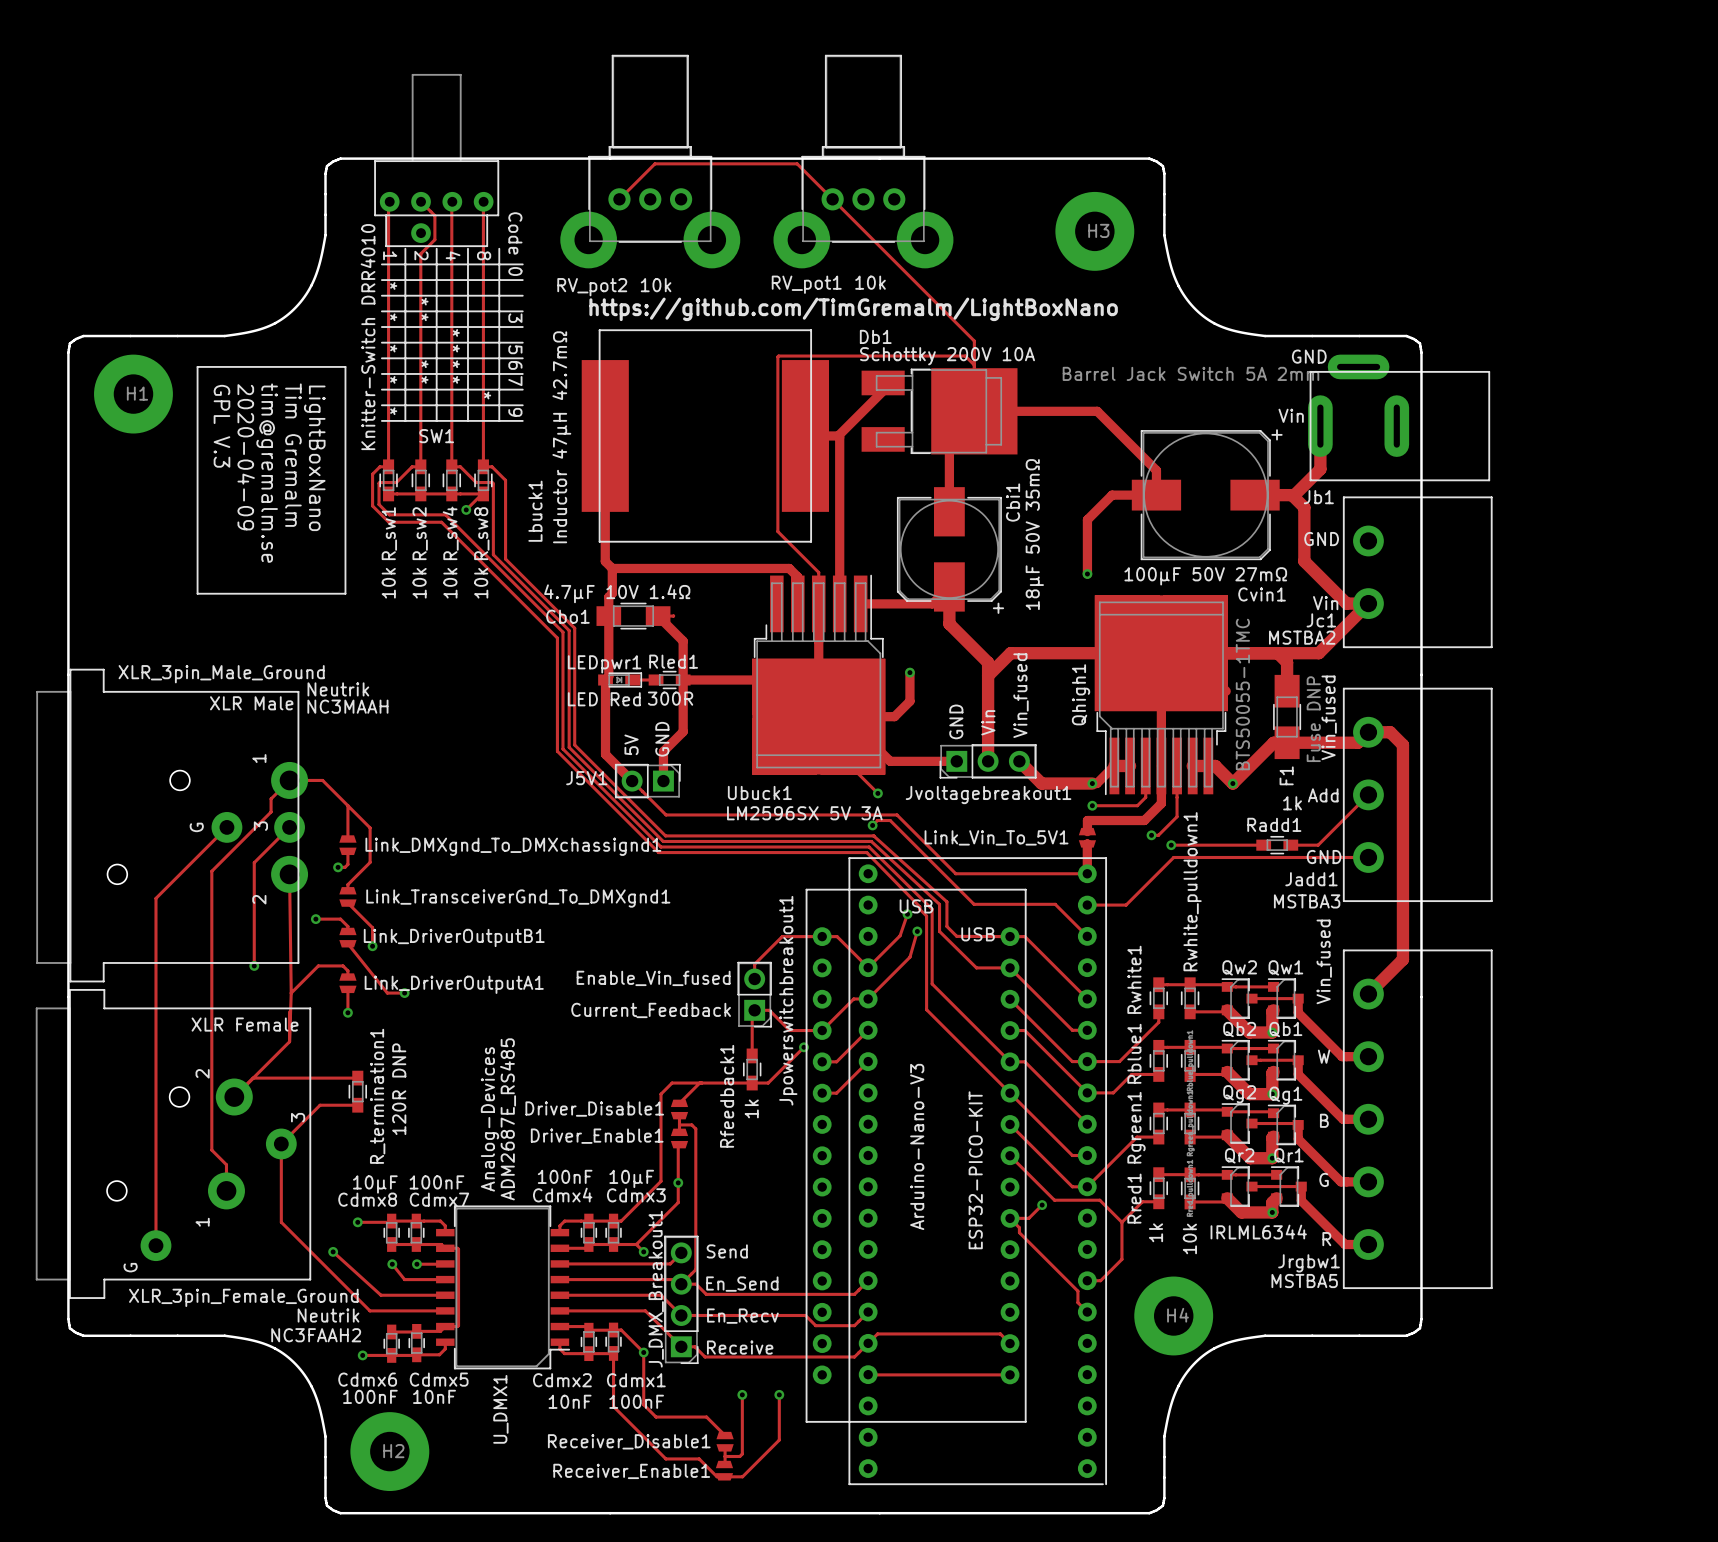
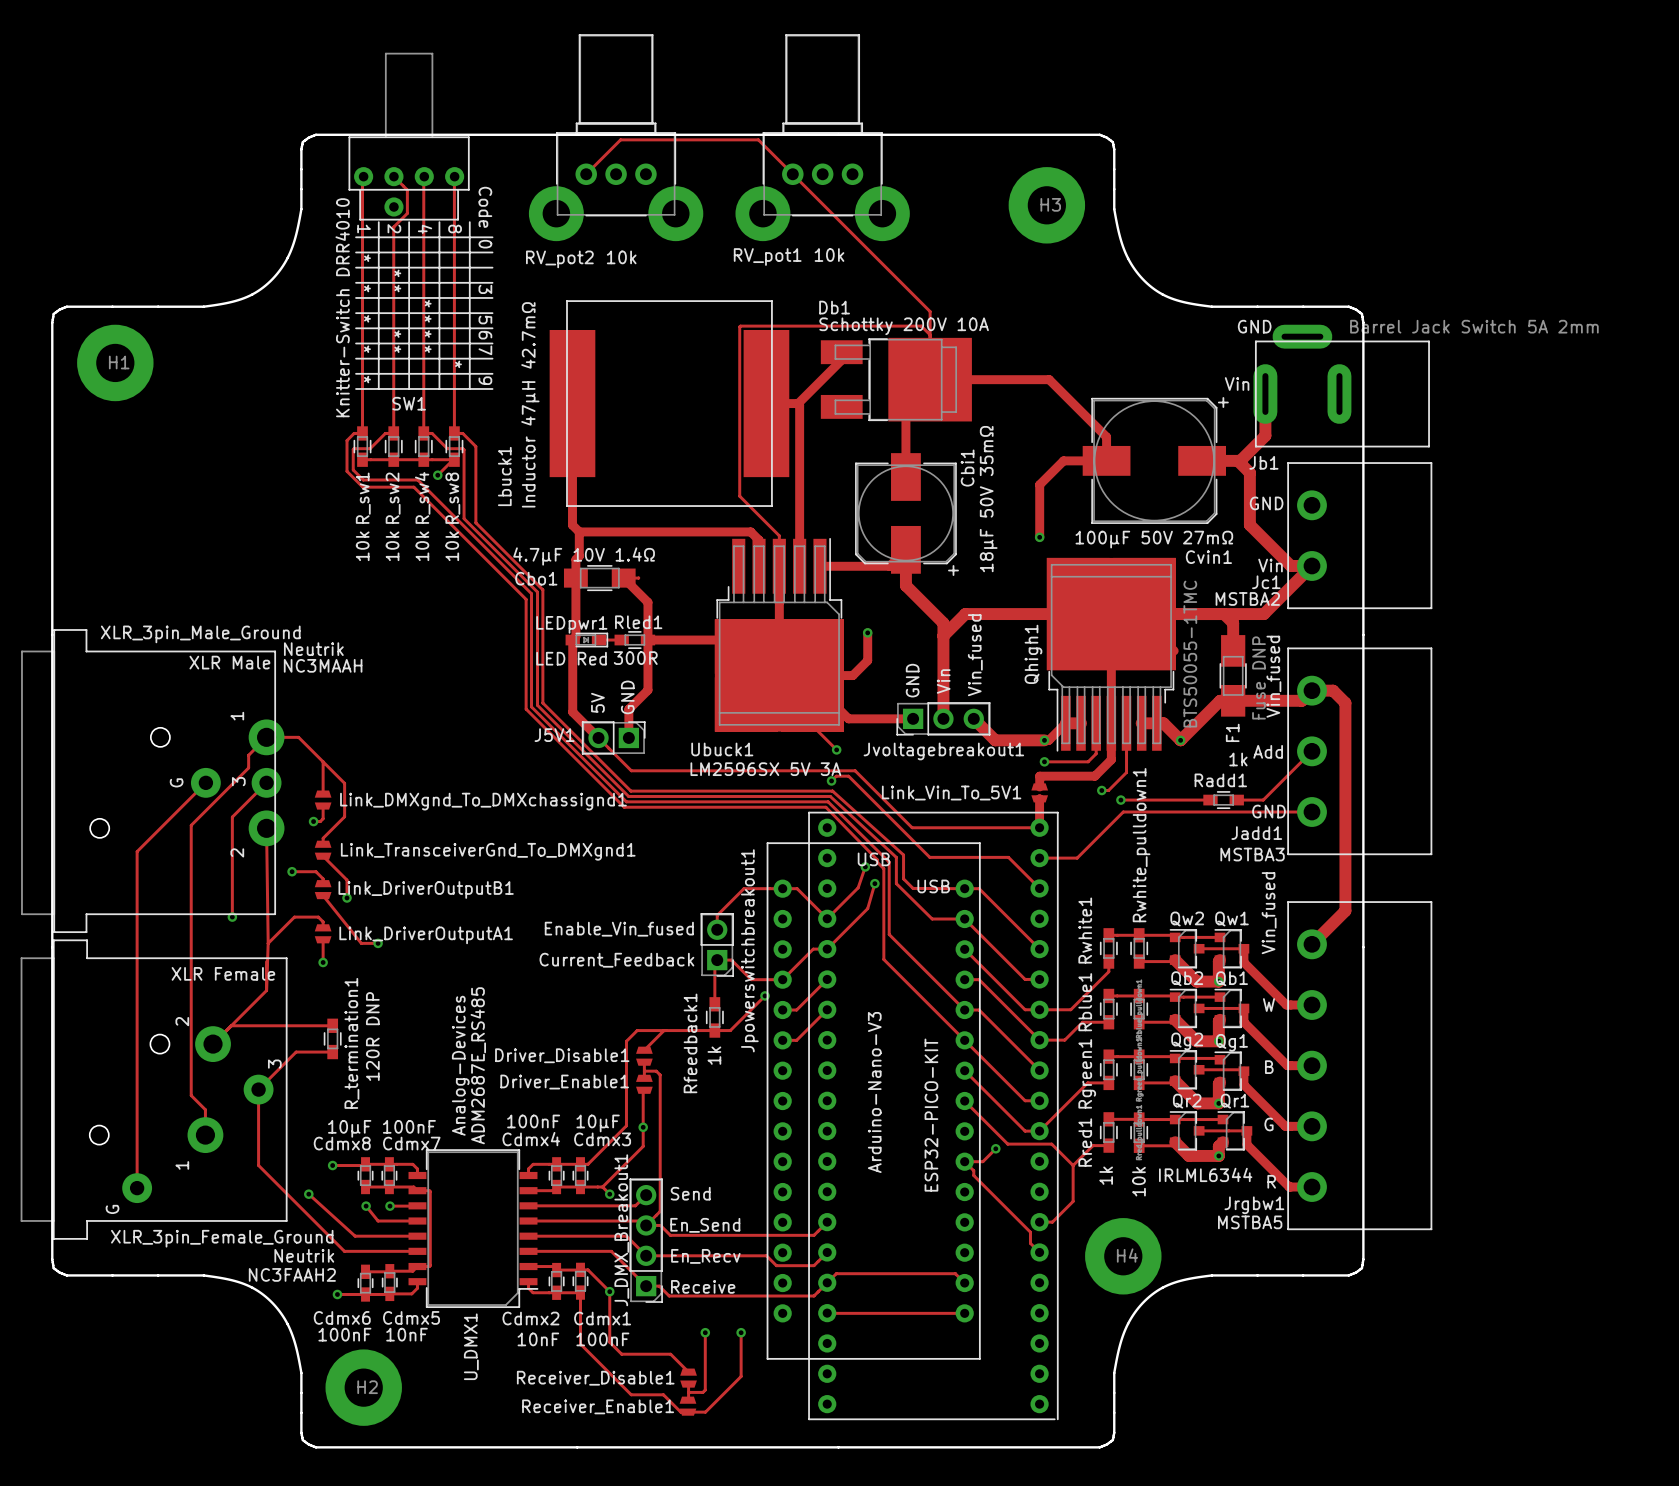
text: https://github.com/TimGremalm/LightBoxNano (853, 309) -> none
line: (197, 366) (197, 593) (345, 593) (345, 366) (197, 366) -> none
Jb1 value position: Barrel Jack Switch 5A 2mm (1190, 373) -> Barrel Jack Switch 5A 2mm (1474, 326)
text: GPL V.3 (221, 426) -> none
text: Tim Gremalm (293, 455) -> none
text: 2020-04-09 (246, 457) -> none
text: LightBoxNano (314, 458) -> none
text: tim@gremalm.se (267, 473) -> none

